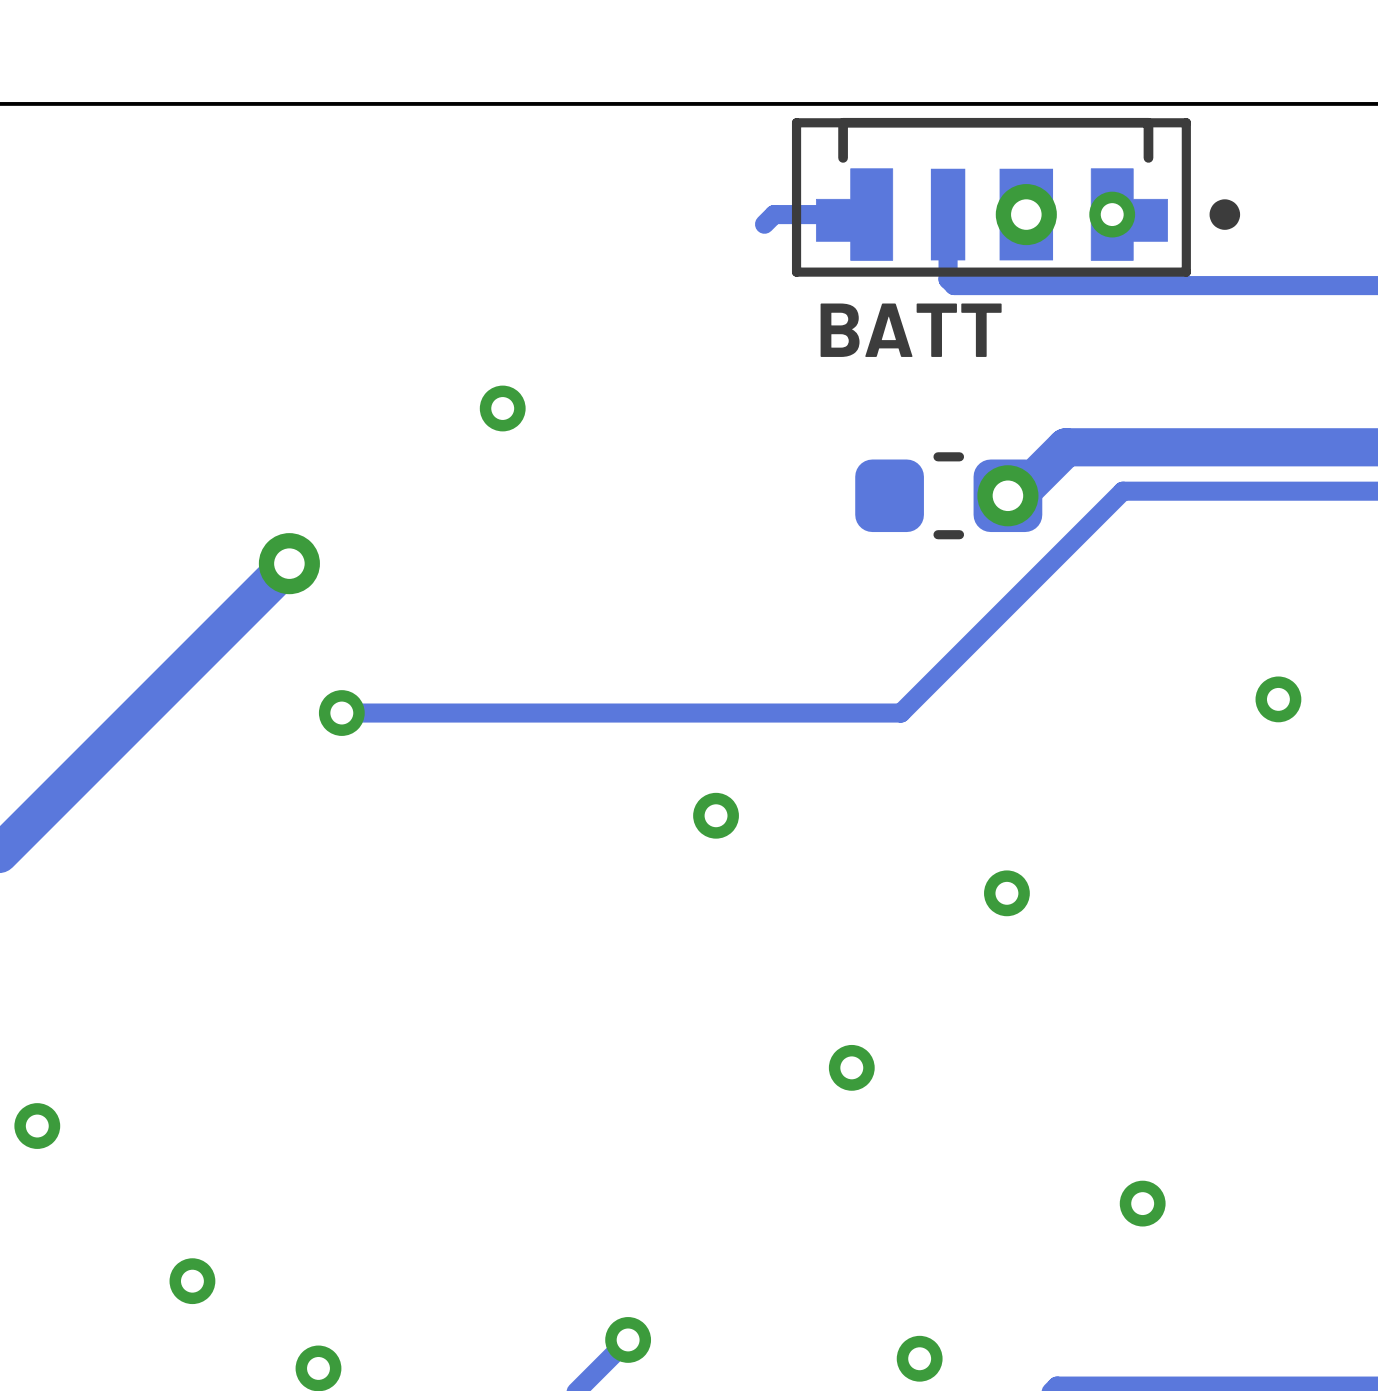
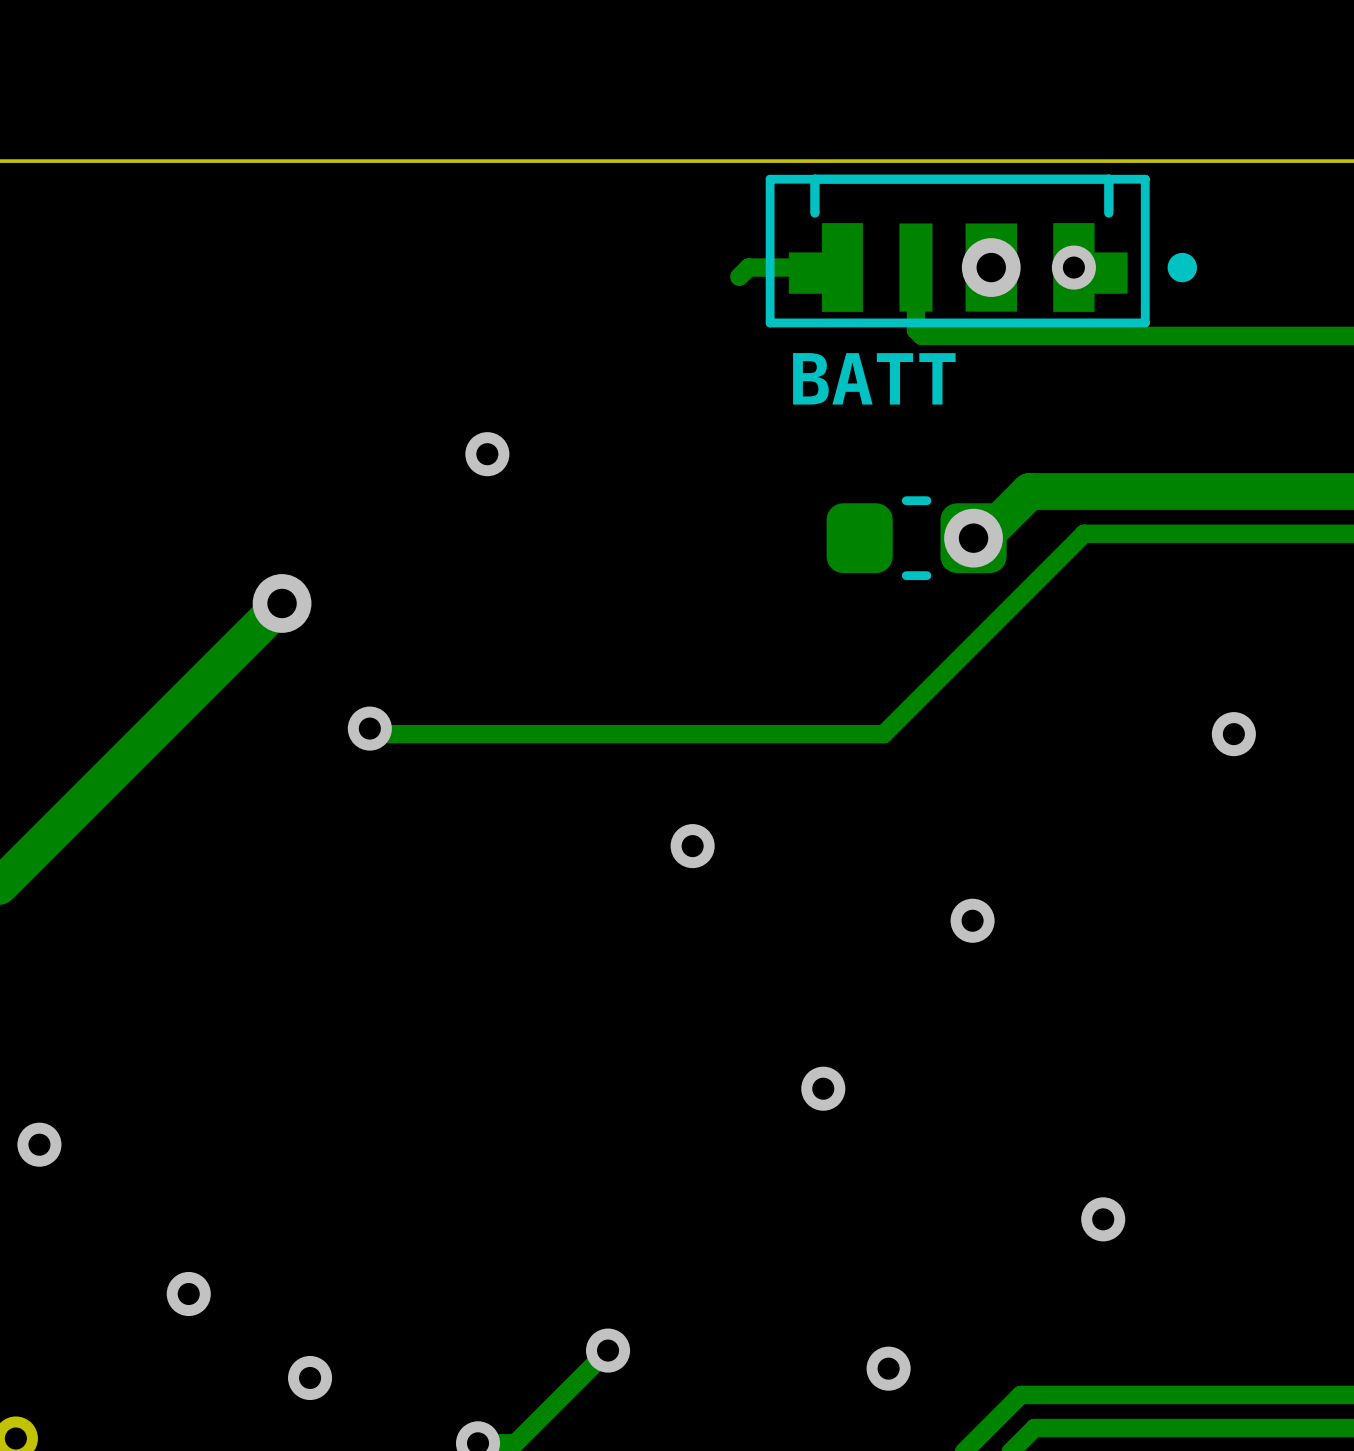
track: (914, 699) (901, 713) (341, 713) -> (883, 734) (375, 734) (369, 728)
via position: (341, 713) -> (369, 728)

